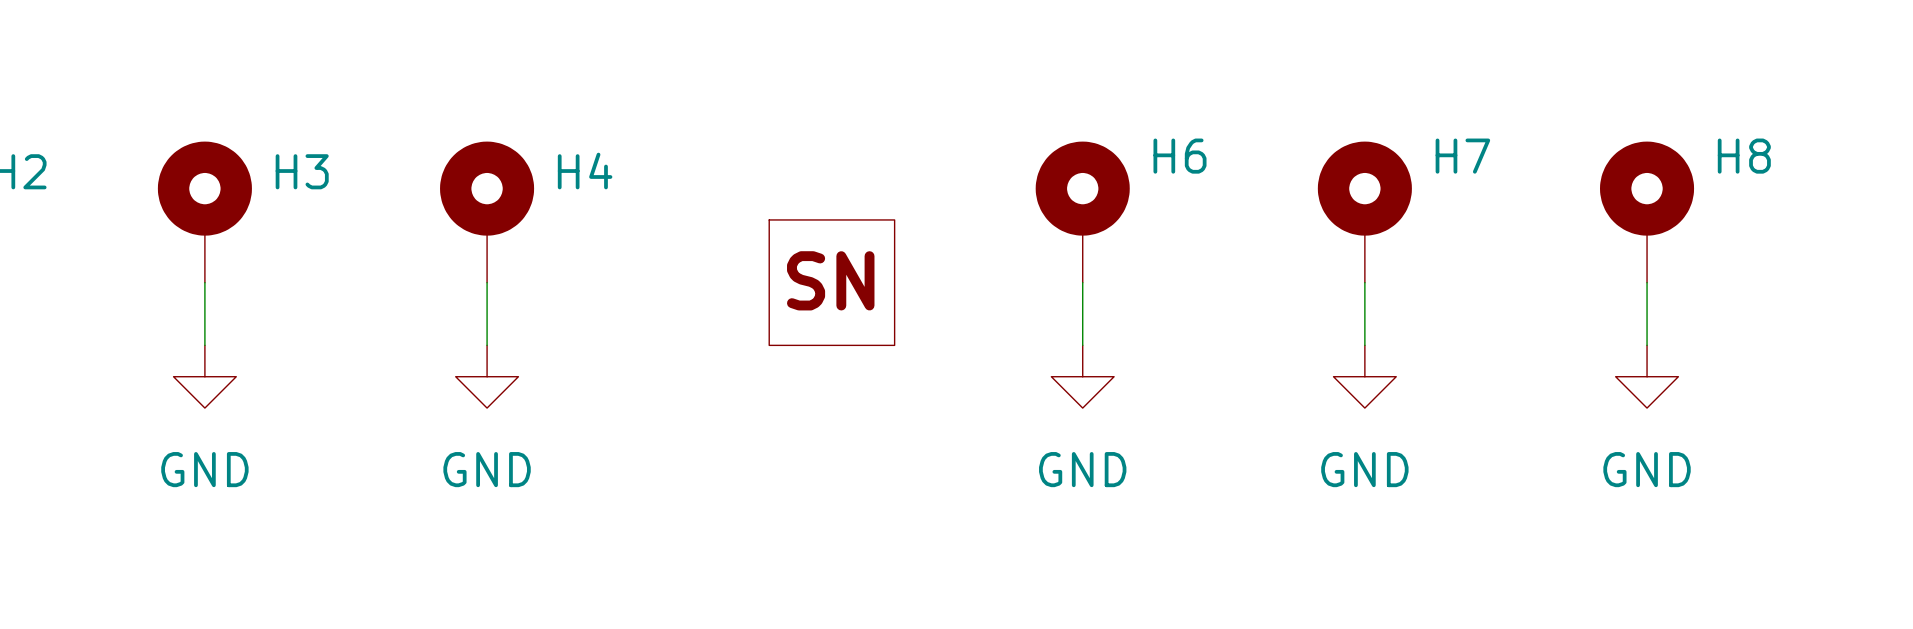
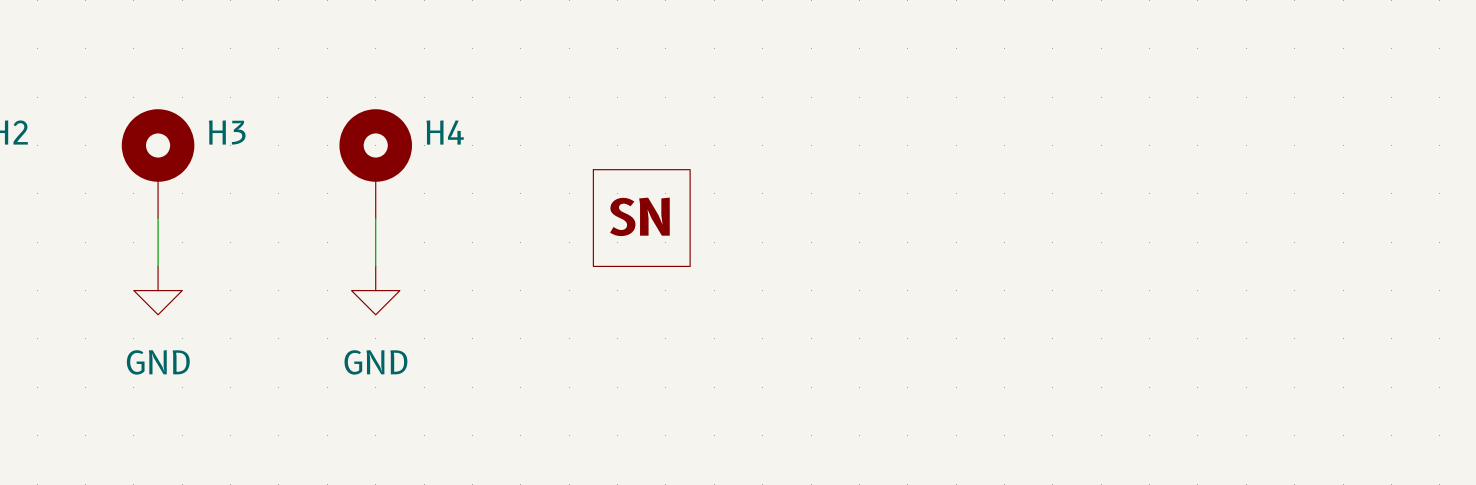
H6: (1082, 212) -> none
H7: (1364, 212) -> none
H8: (1647, 212) -> none
wire: (1082, 282) (1082, 345) -> none
wire: (1364, 282) (1364, 345) -> none
wire: (1647, 282) (1647, 345) -> none
power symbol: GND (1082, 376) -> none
power symbol: GND (1364, 376) -> none
power symbol: GND (1647, 376) -> none

